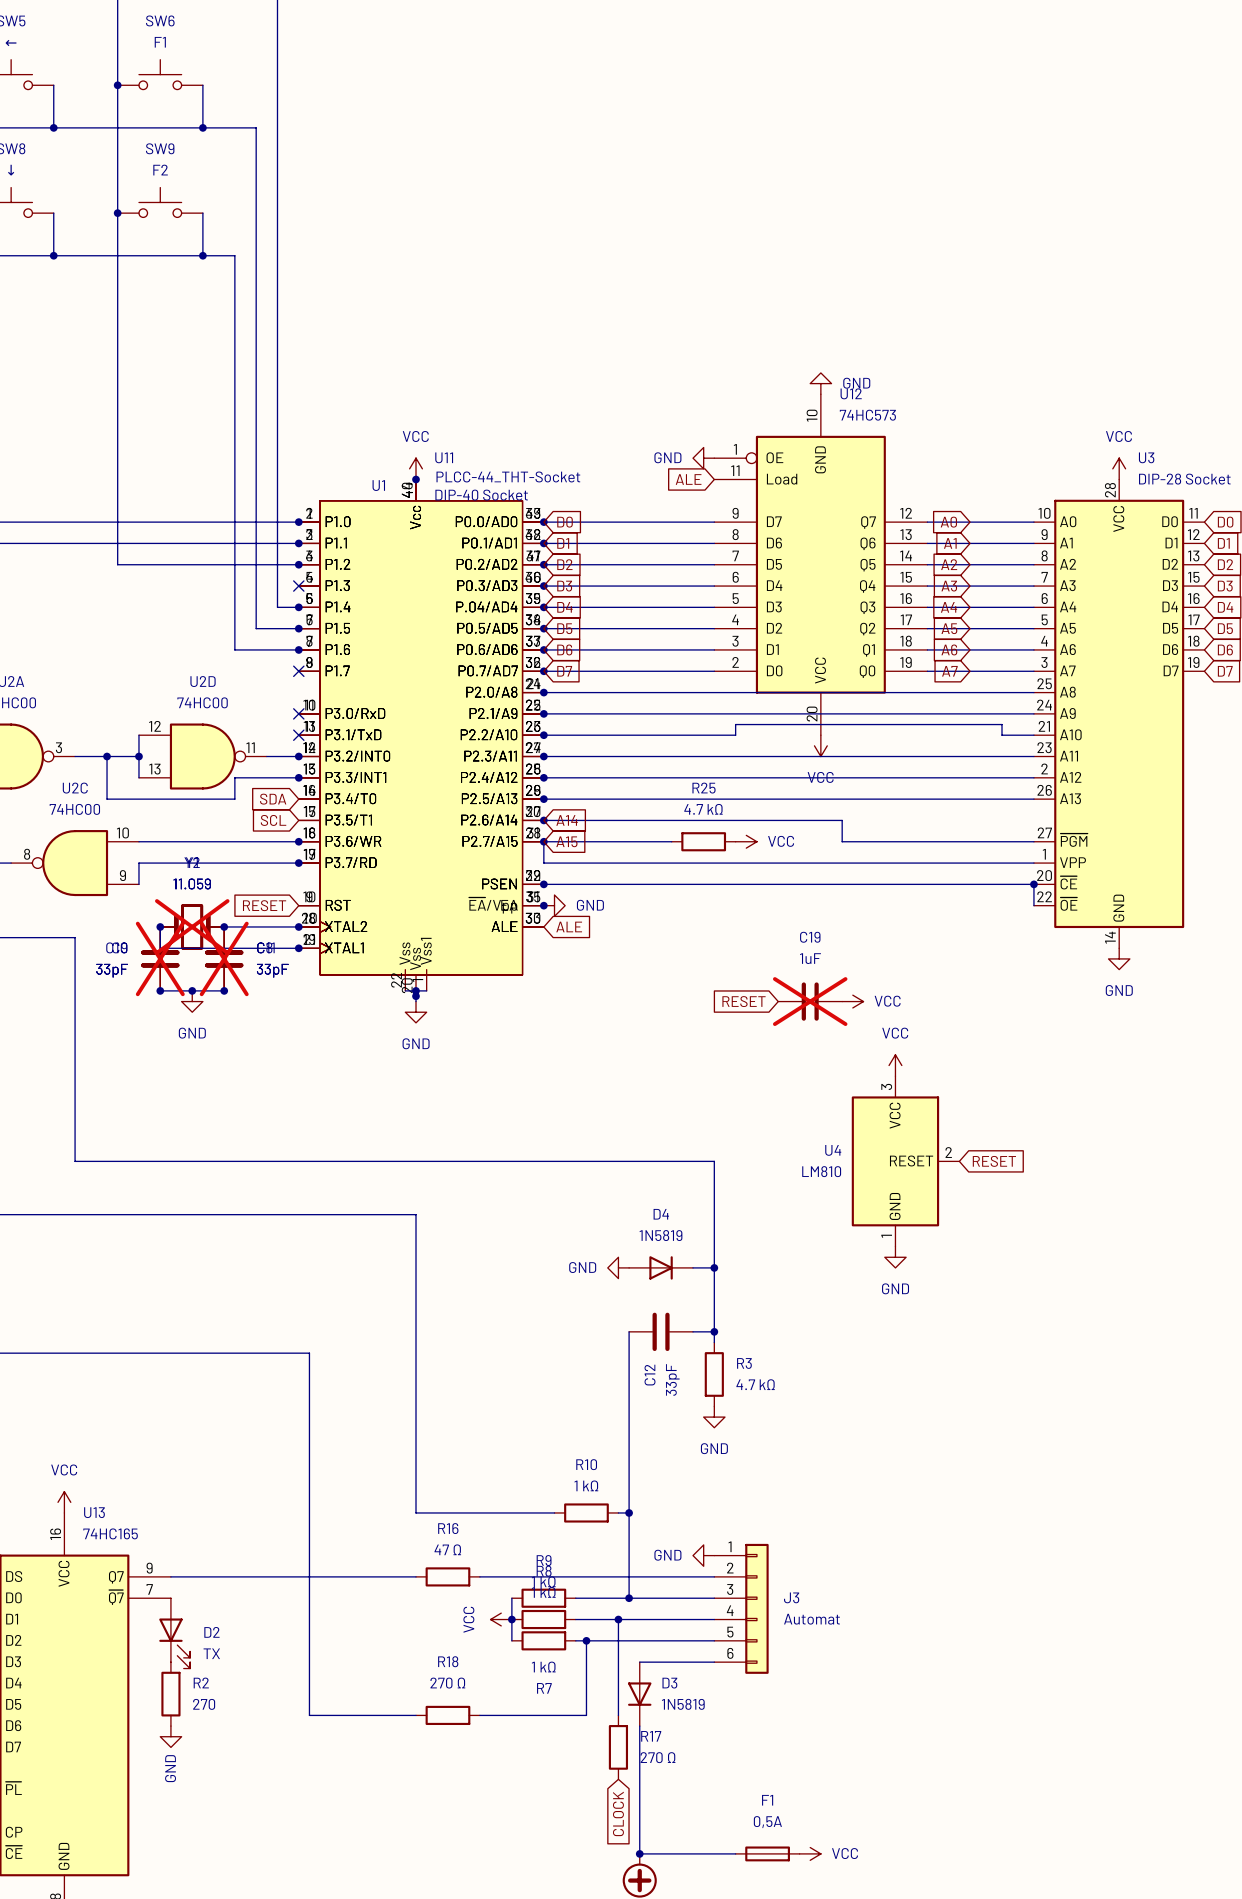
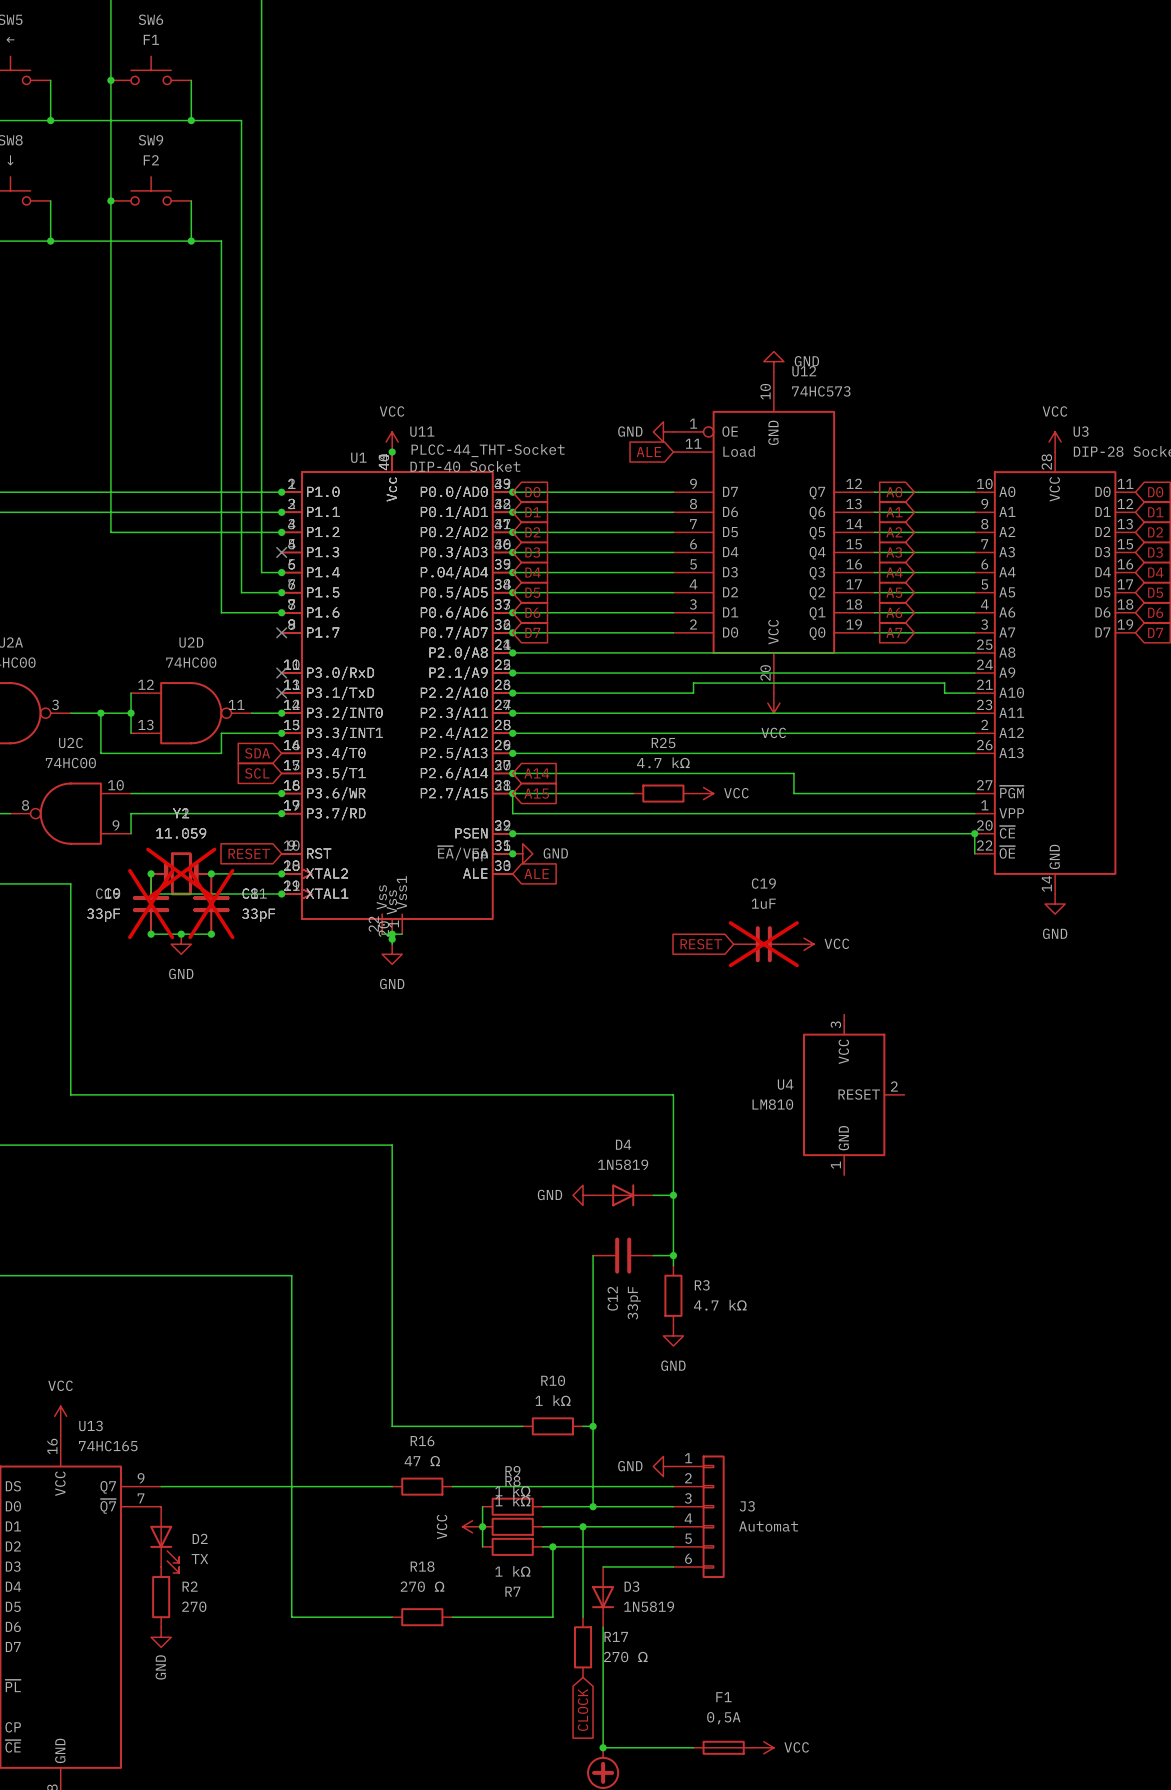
power symbol: VCC (895, 1065) -> none
global label: RESET (994, 1161) -> none
power symbol: GND (895, 1257) -> none

